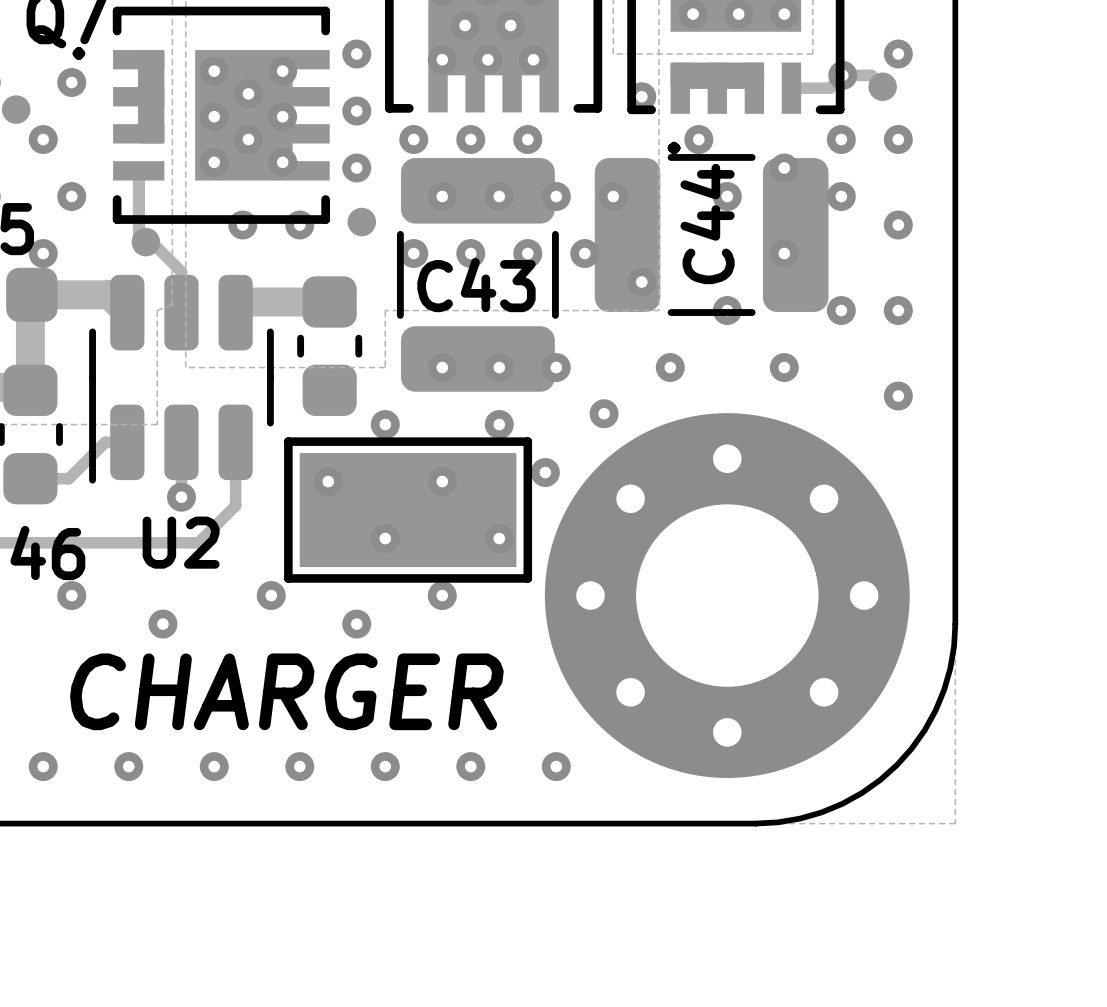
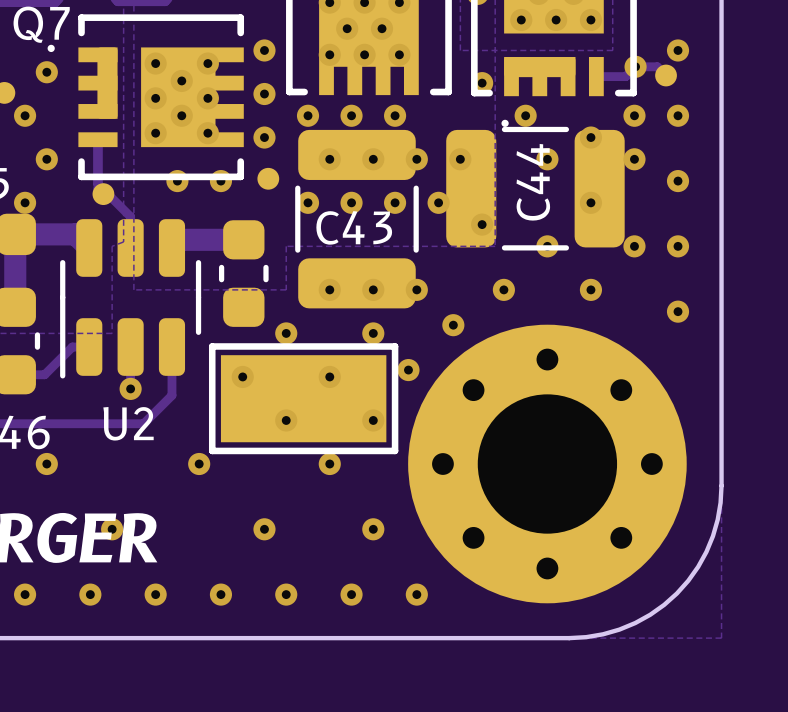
via position: (162, 624) -> (112, 529)
via position: (356, 624) -> (264, 529)
via: none -> (373, 529)

